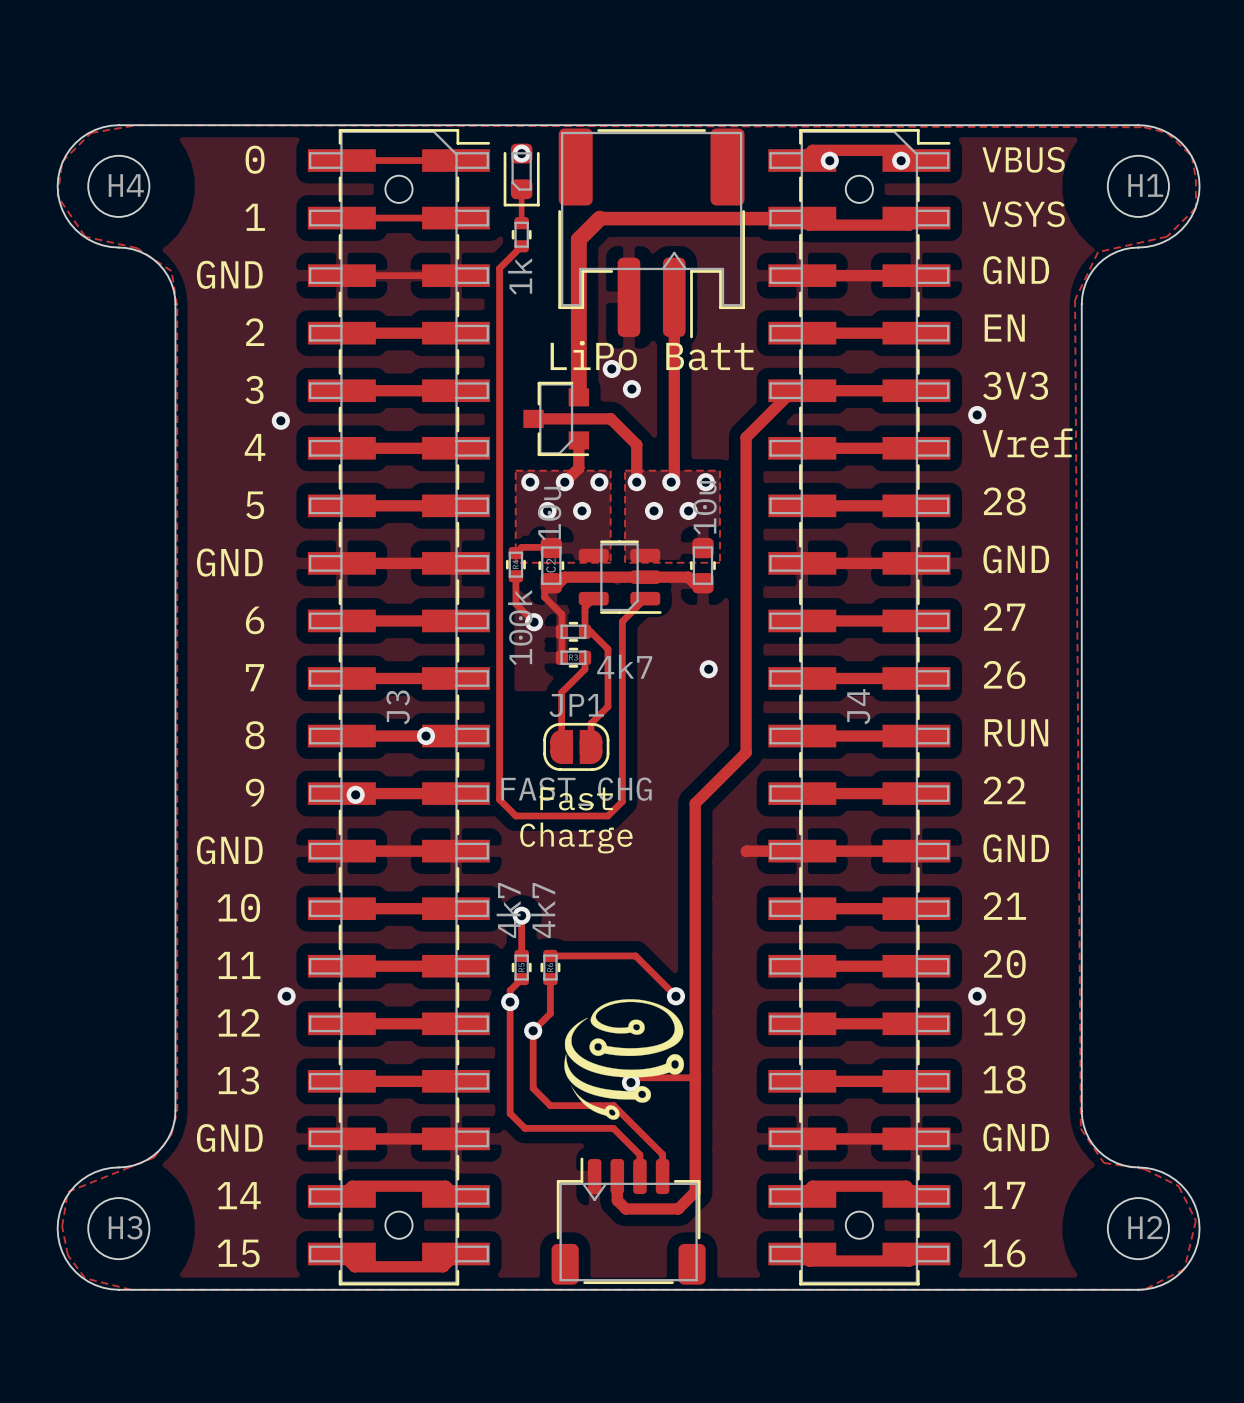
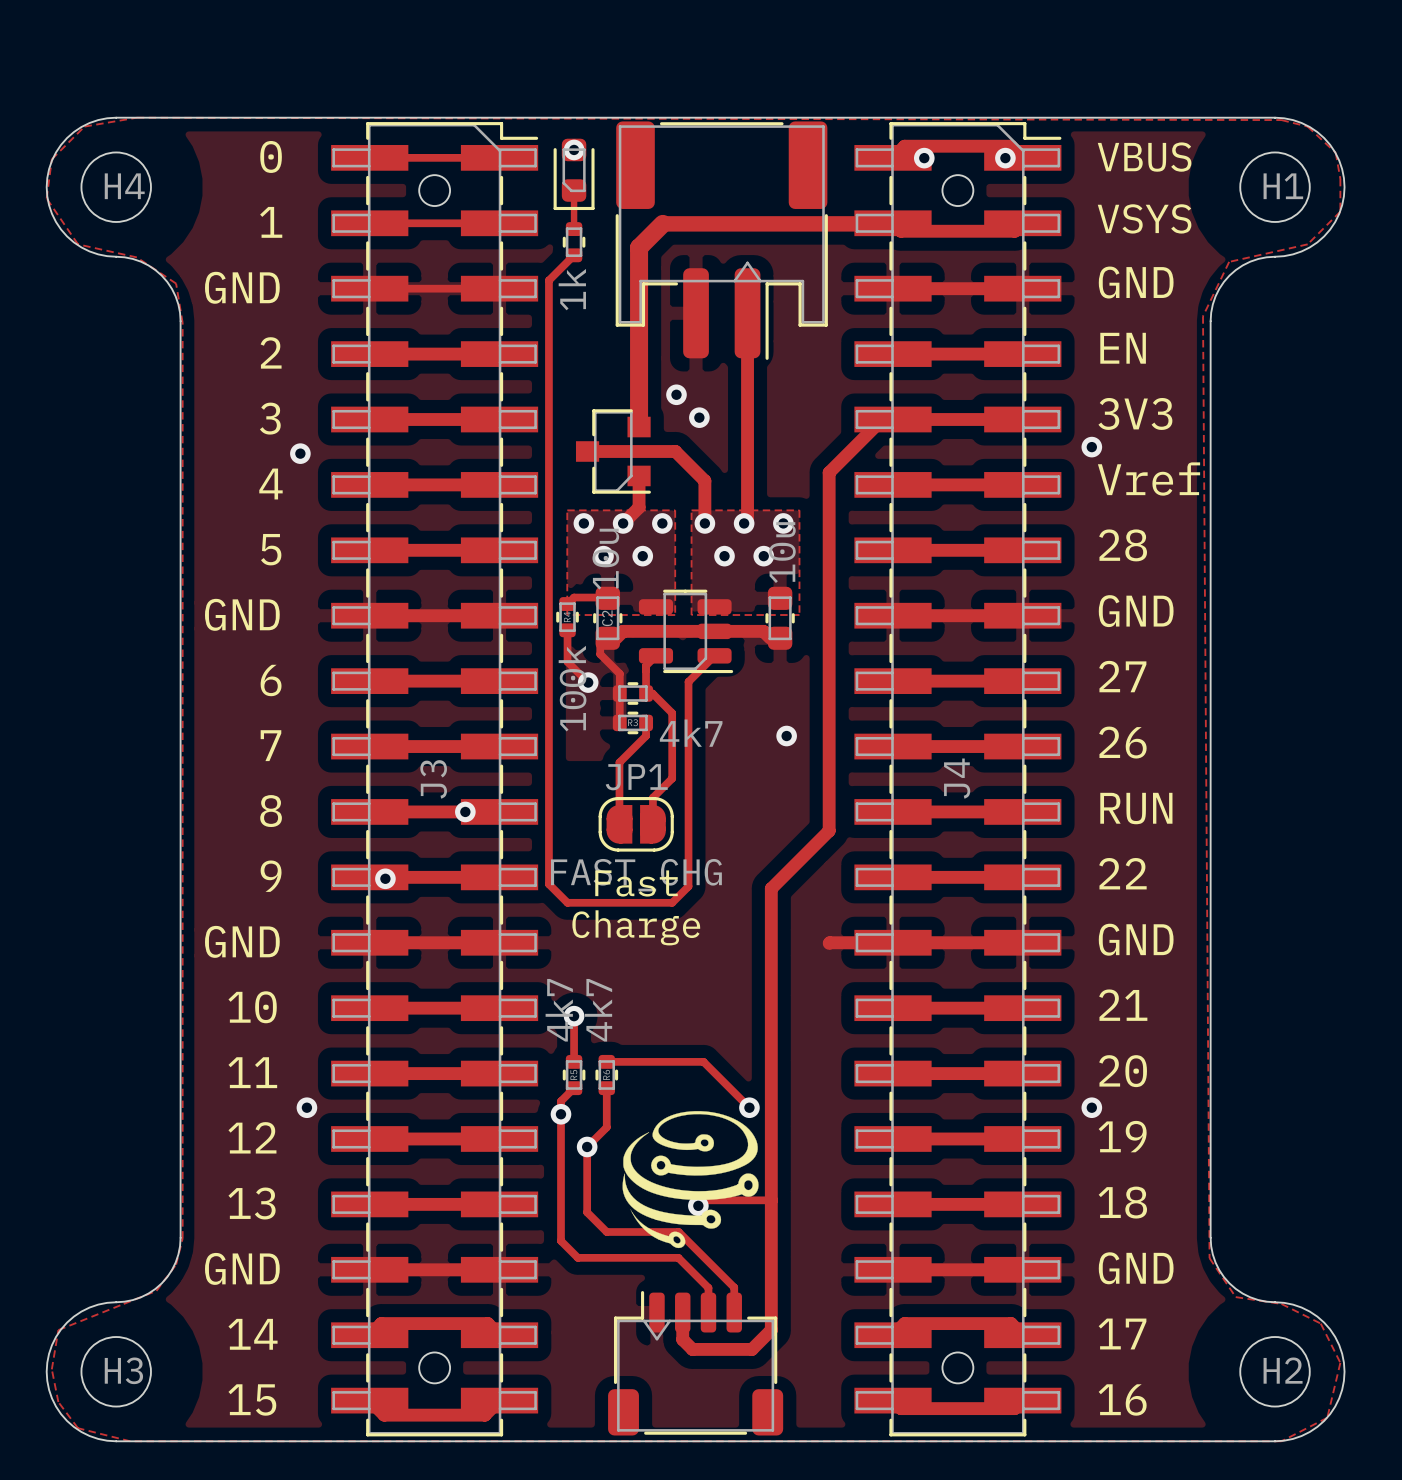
text: LiPo Batt (652, 355) -> none

